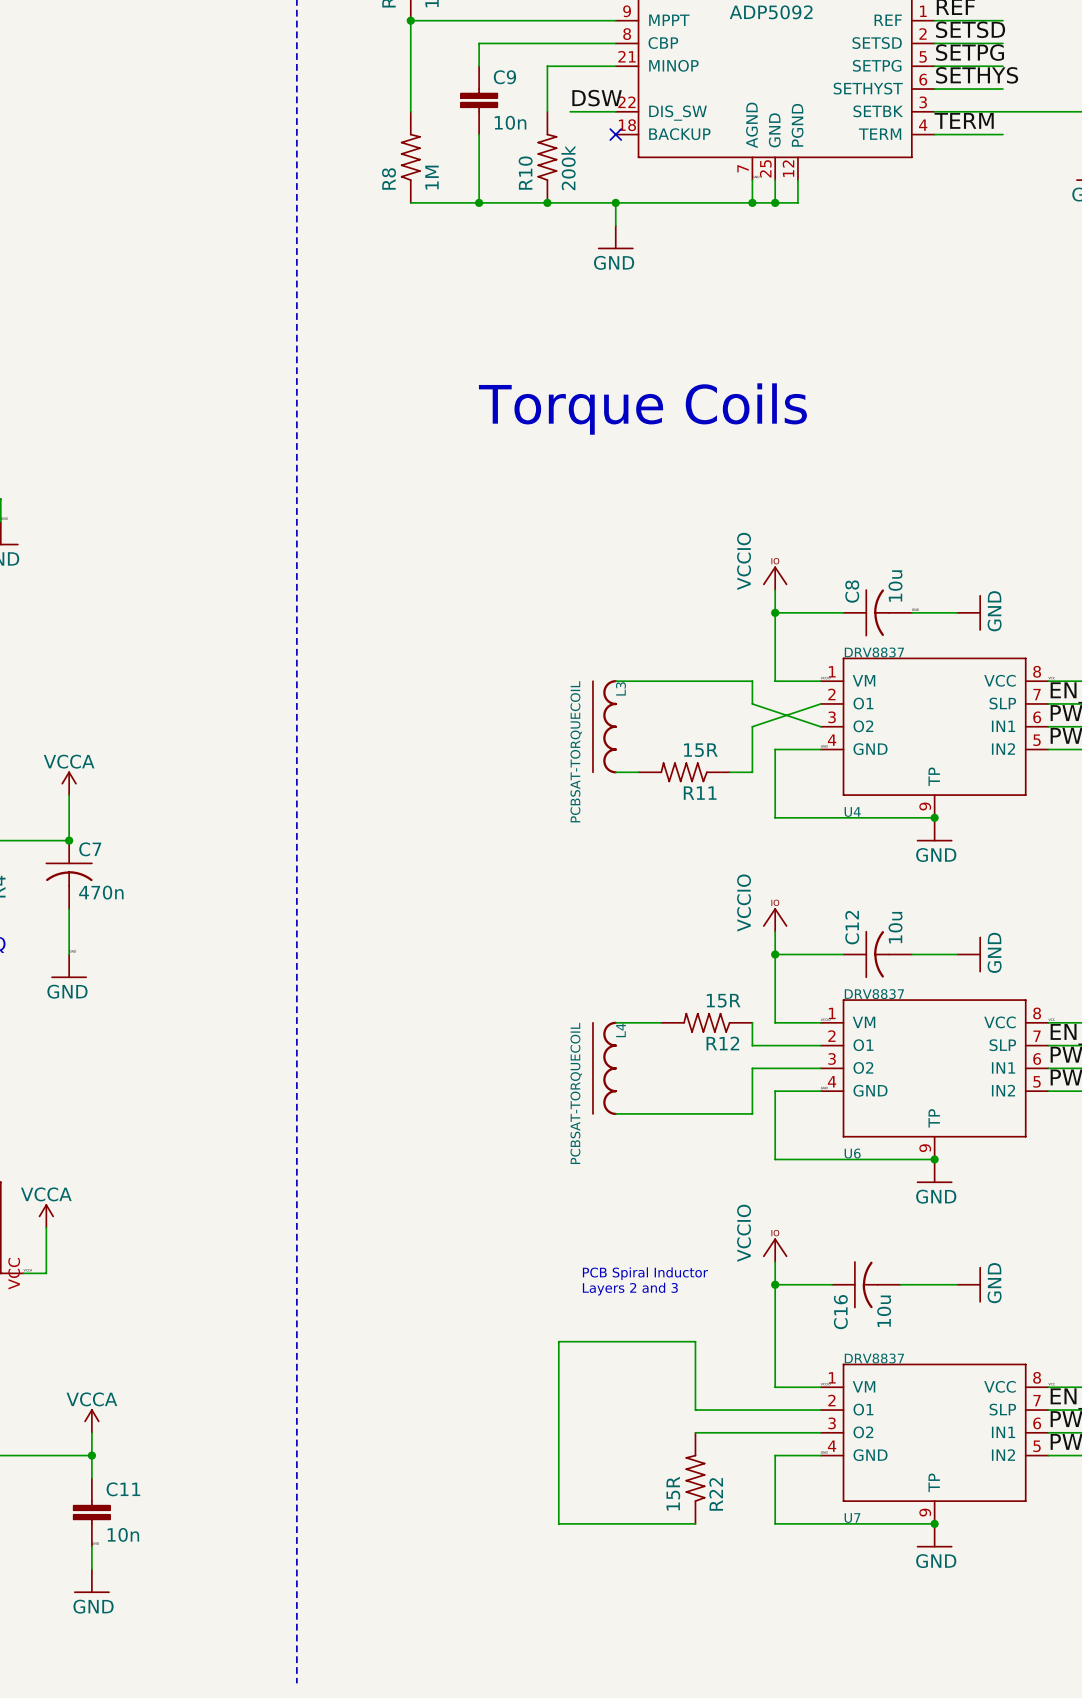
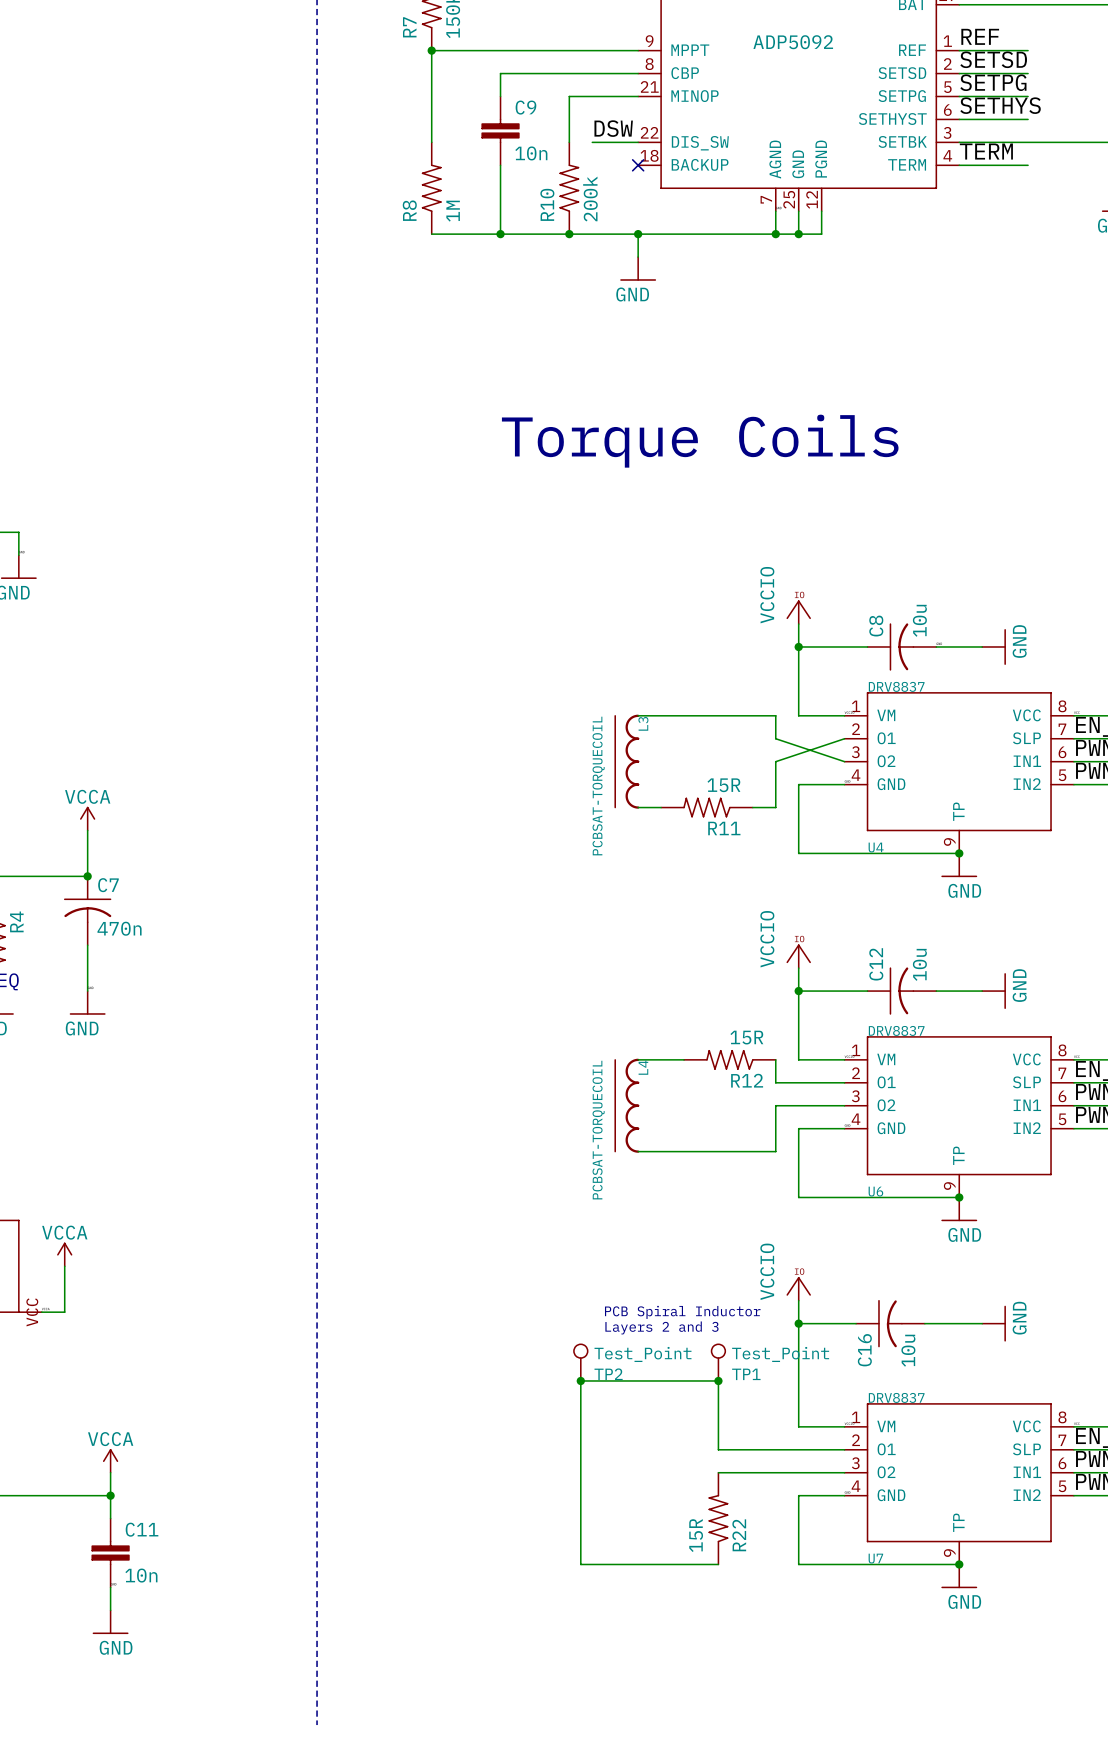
TP2: none -> Test_Point (580, 1362)
TP1: none -> Test_Point (718, 1362)
junction: none -> (580, 1380)
junction: none -> (718, 1380)

